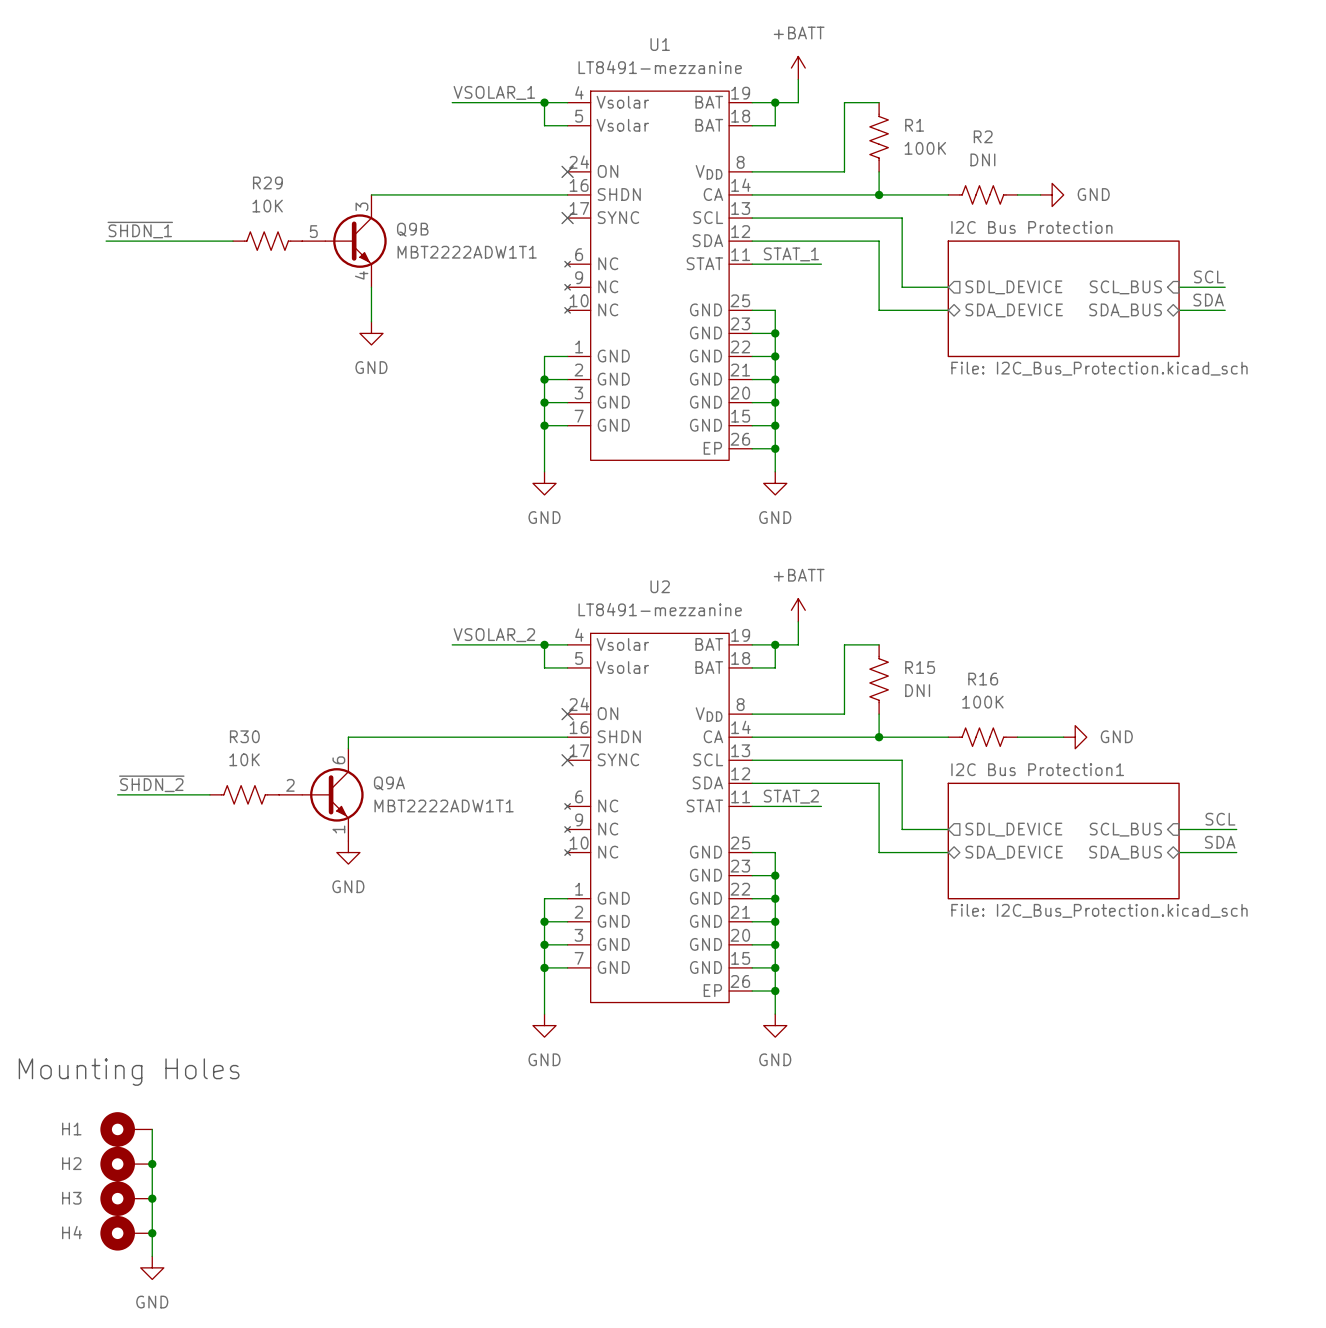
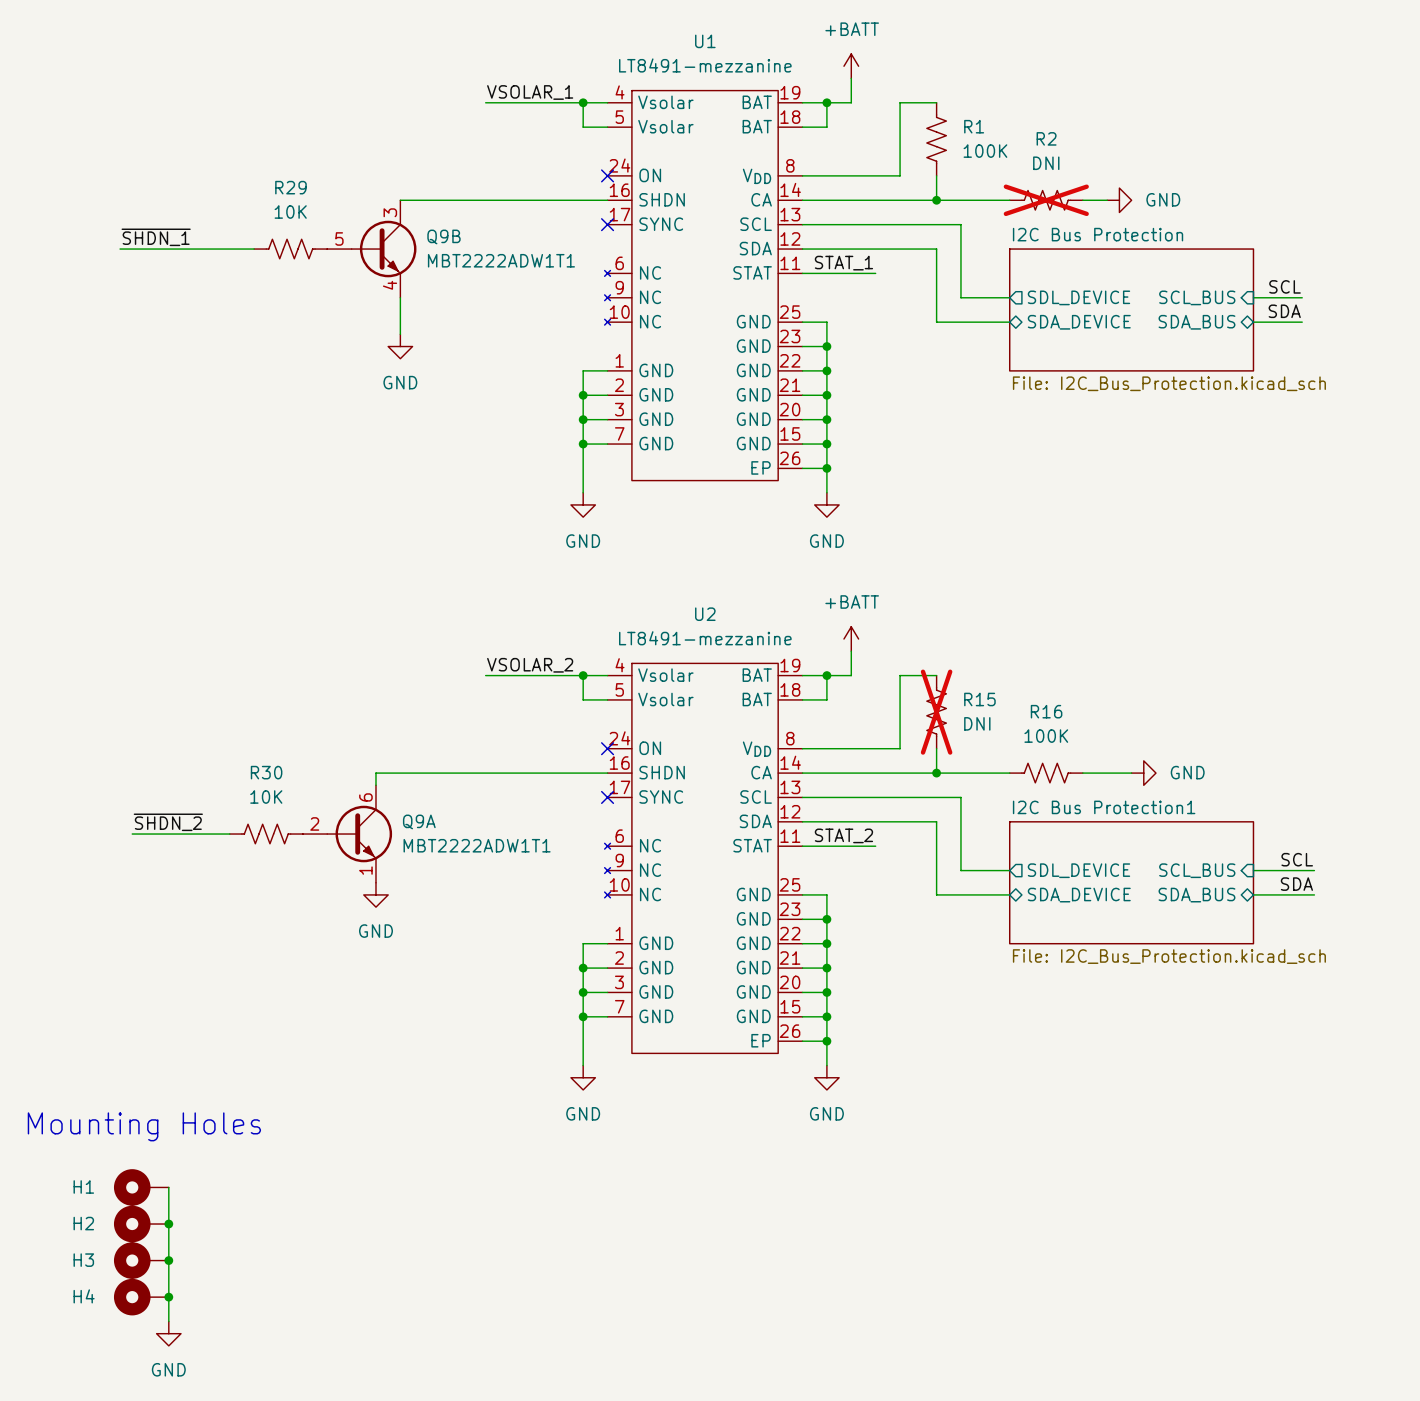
R2 do-not-place cross: none -> (1046, 200)
R15 do-not-place cross: none -> (936, 712)

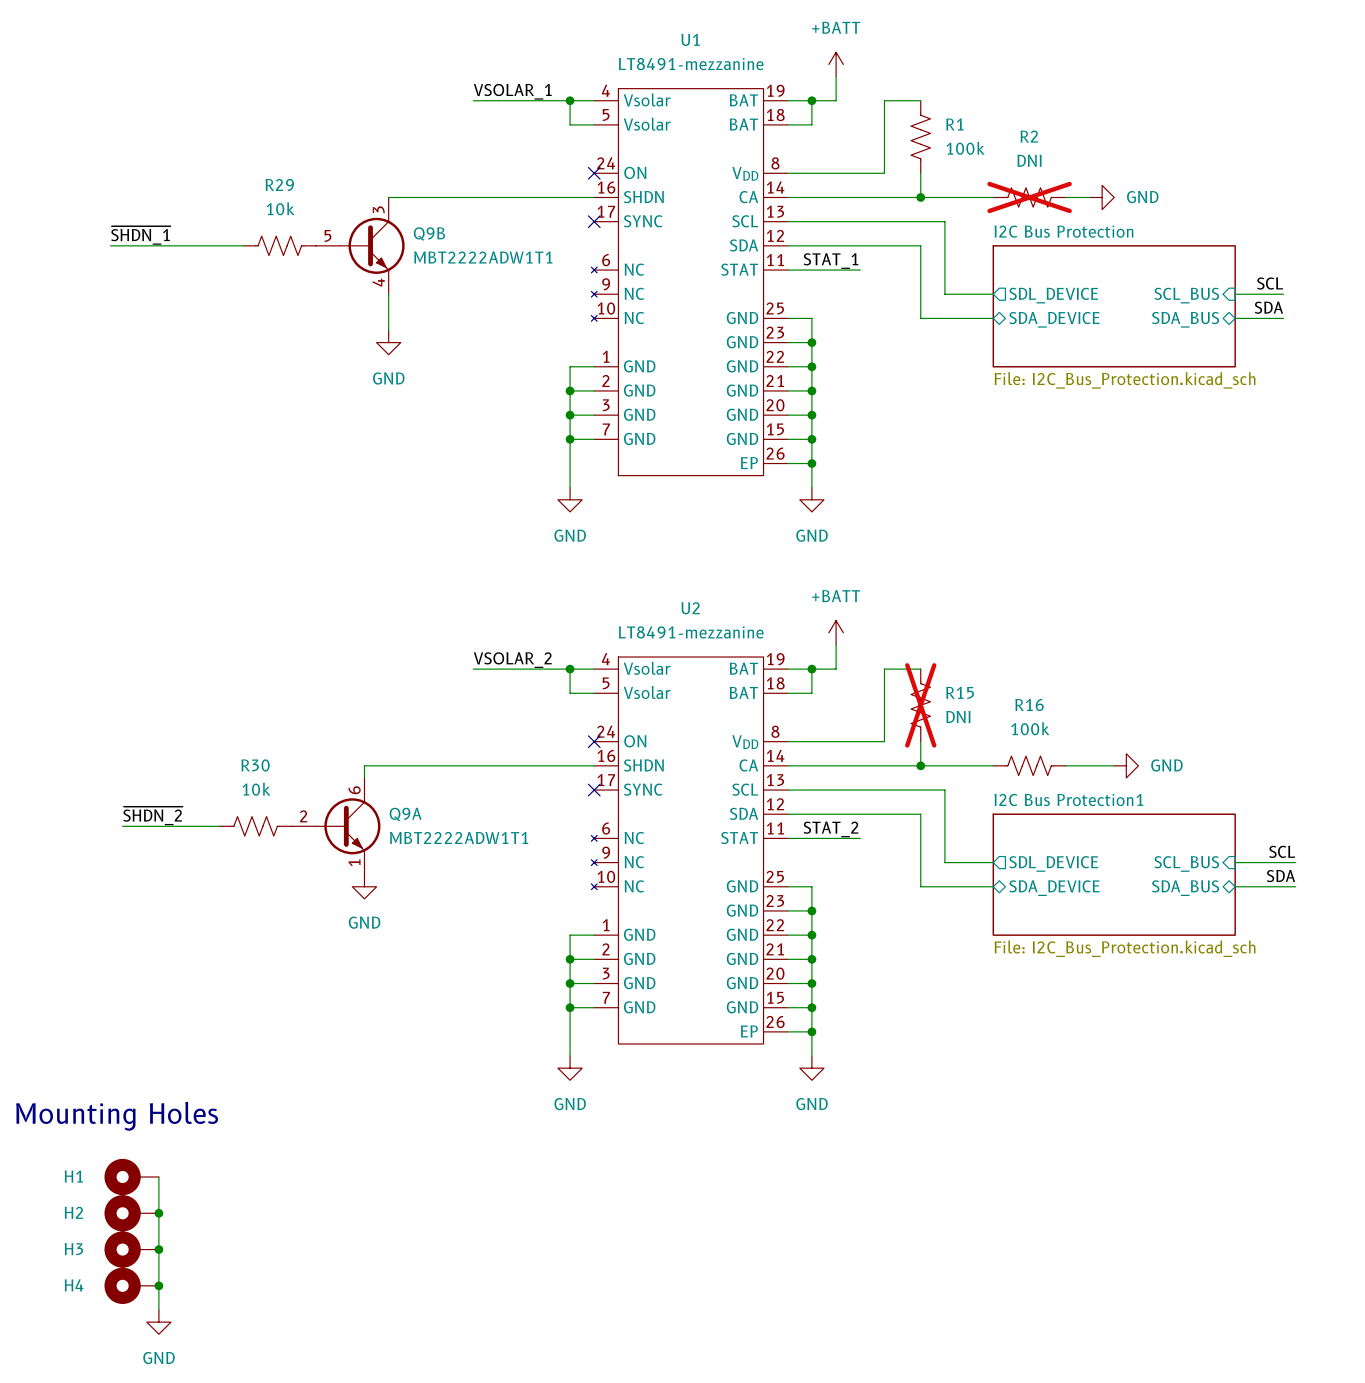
R1 value: 100K (985, 151) -> 100k (965, 148)
R29 value: 10K (290, 212) -> 10k (280, 208)
R16 value: 100K (1046, 736) -> 100k (1030, 728)
R30 value: 10K (266, 797) -> 10k (256, 789)

